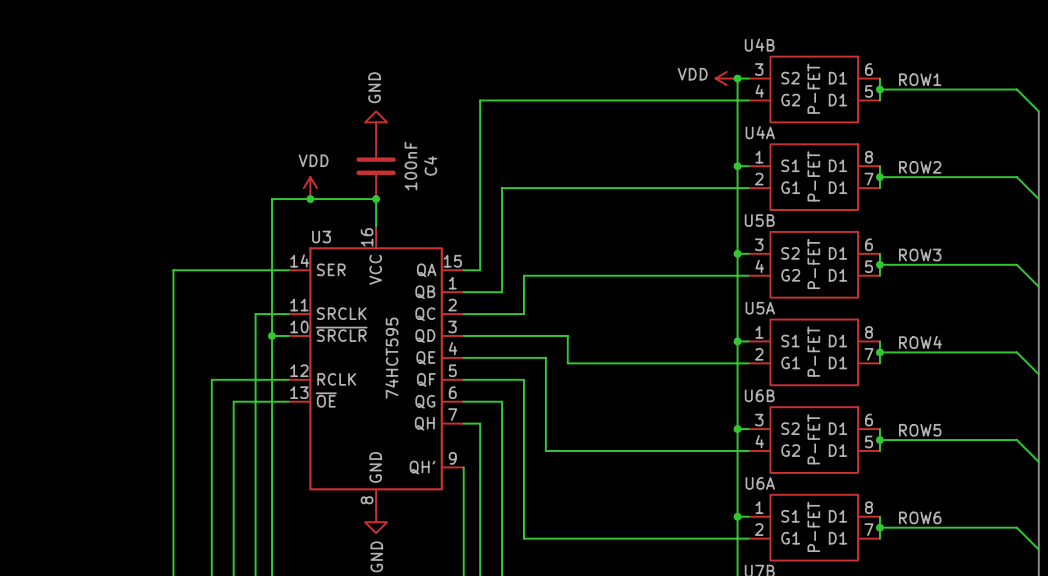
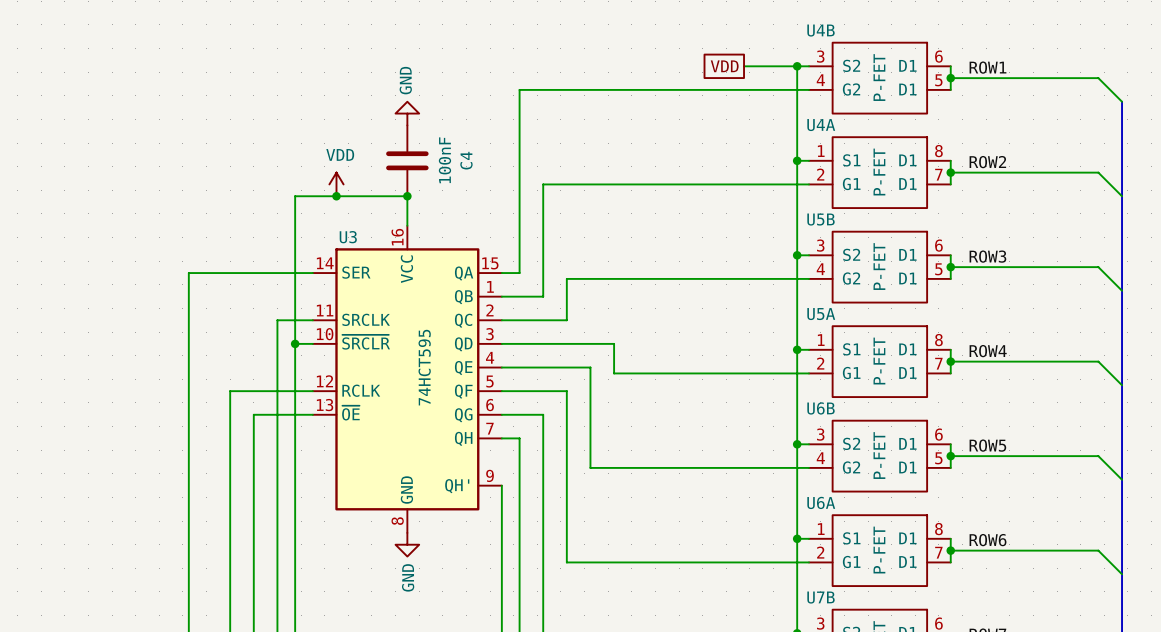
global label: none -> VDD (724, 66)
power symbol: VDD (726, 78) -> none

